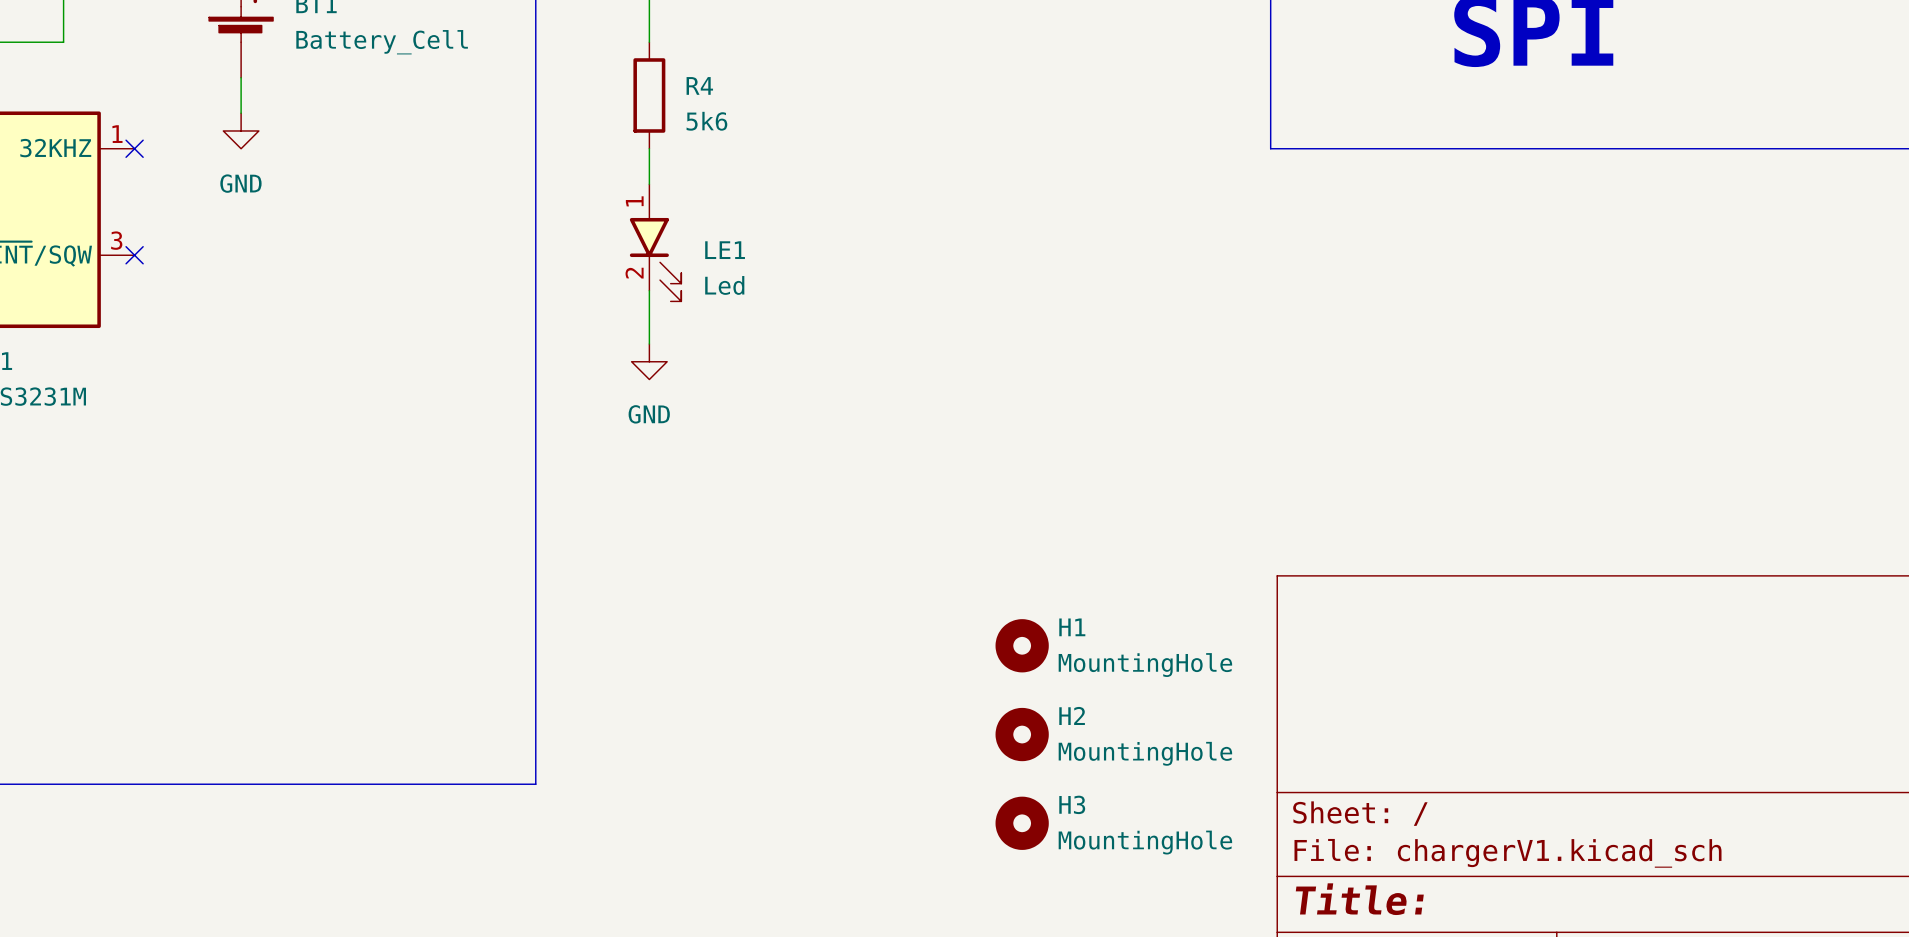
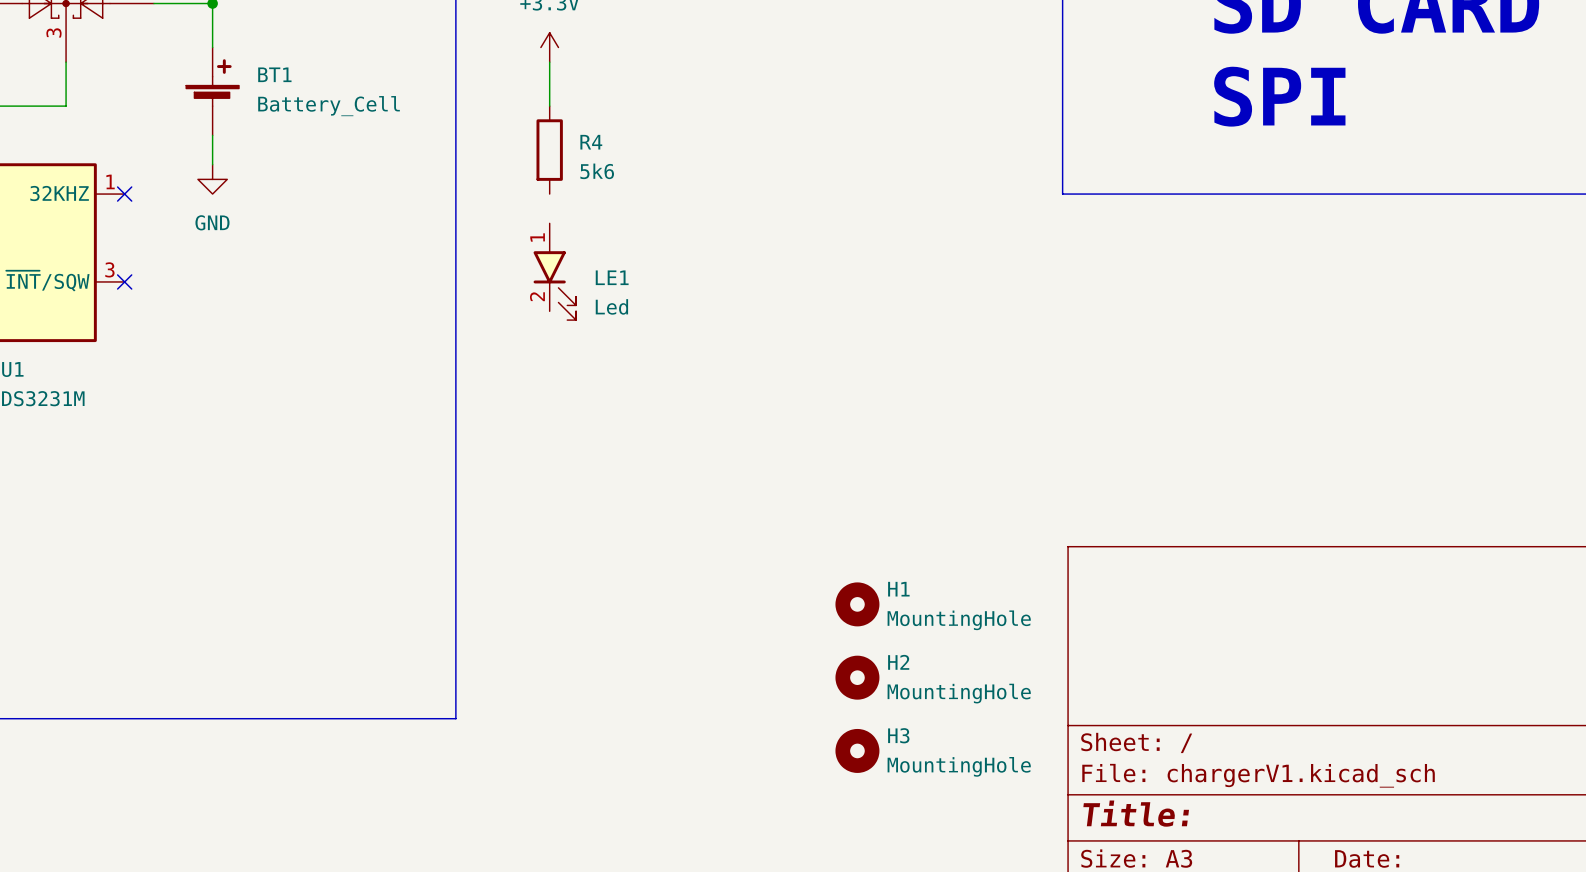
wire: (649, 148) (649, 184) -> none
wire: (649, 290) (649, 344) -> none
power symbol: GND (649, 361) -> none

